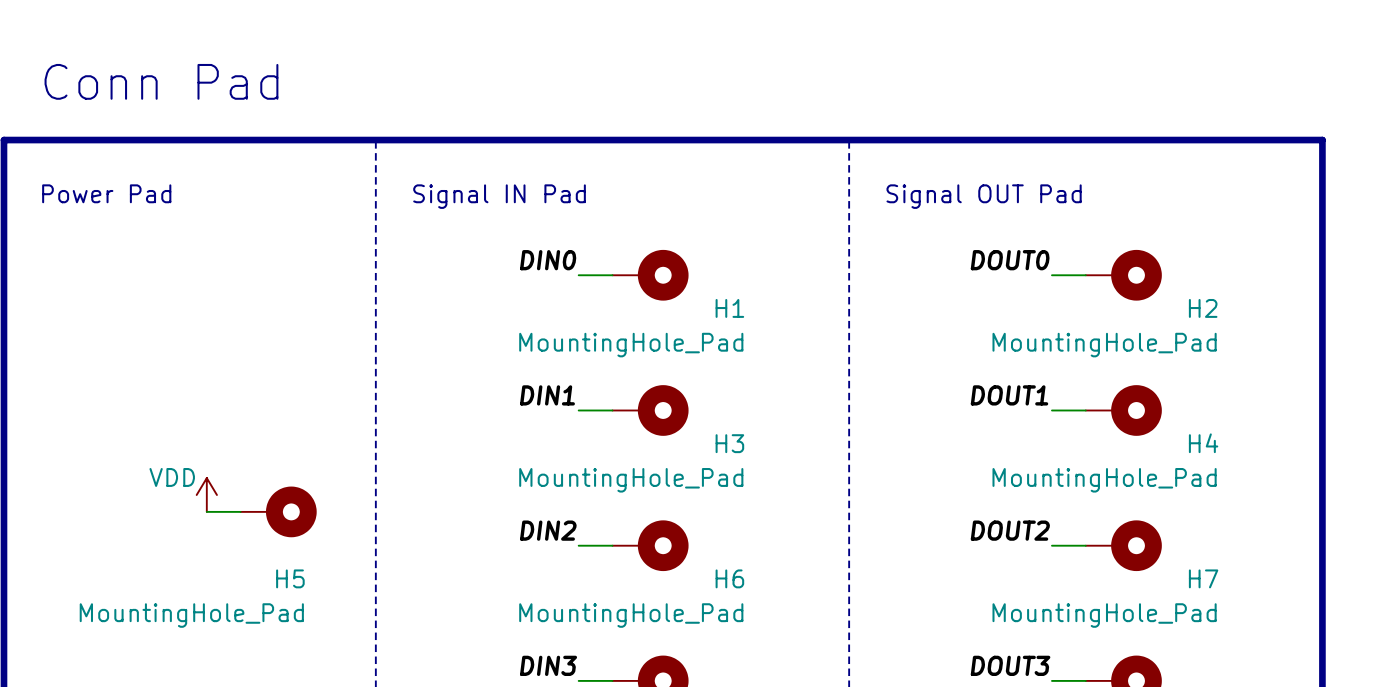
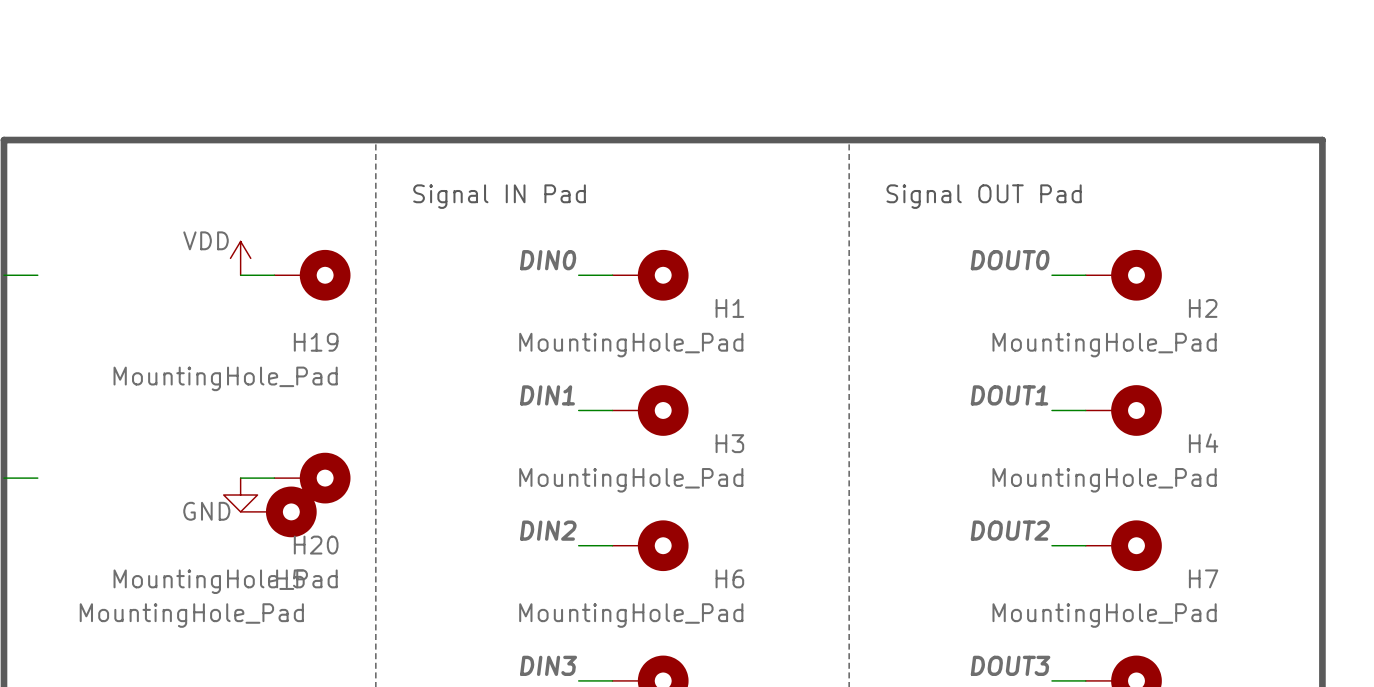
text: Conn Pad (161, 81) -> none
text: Power Pad (106, 193) -> none
wire: none -> (3, 275) (37, 275)
H19: none -> MountingHole_Pad (312, 275)
wire: none -> (3, 478) (37, 478)
wire: none -> (240, 478) (274, 478)
H20: none -> MountingHole_Pad (312, 478)
power symbol position: VDD (206, 495) -> VDD (240, 258)
power symbol: none -> GND (240, 495)
wire: (206, 511) (240, 511) -> (240, 275) (274, 275)

